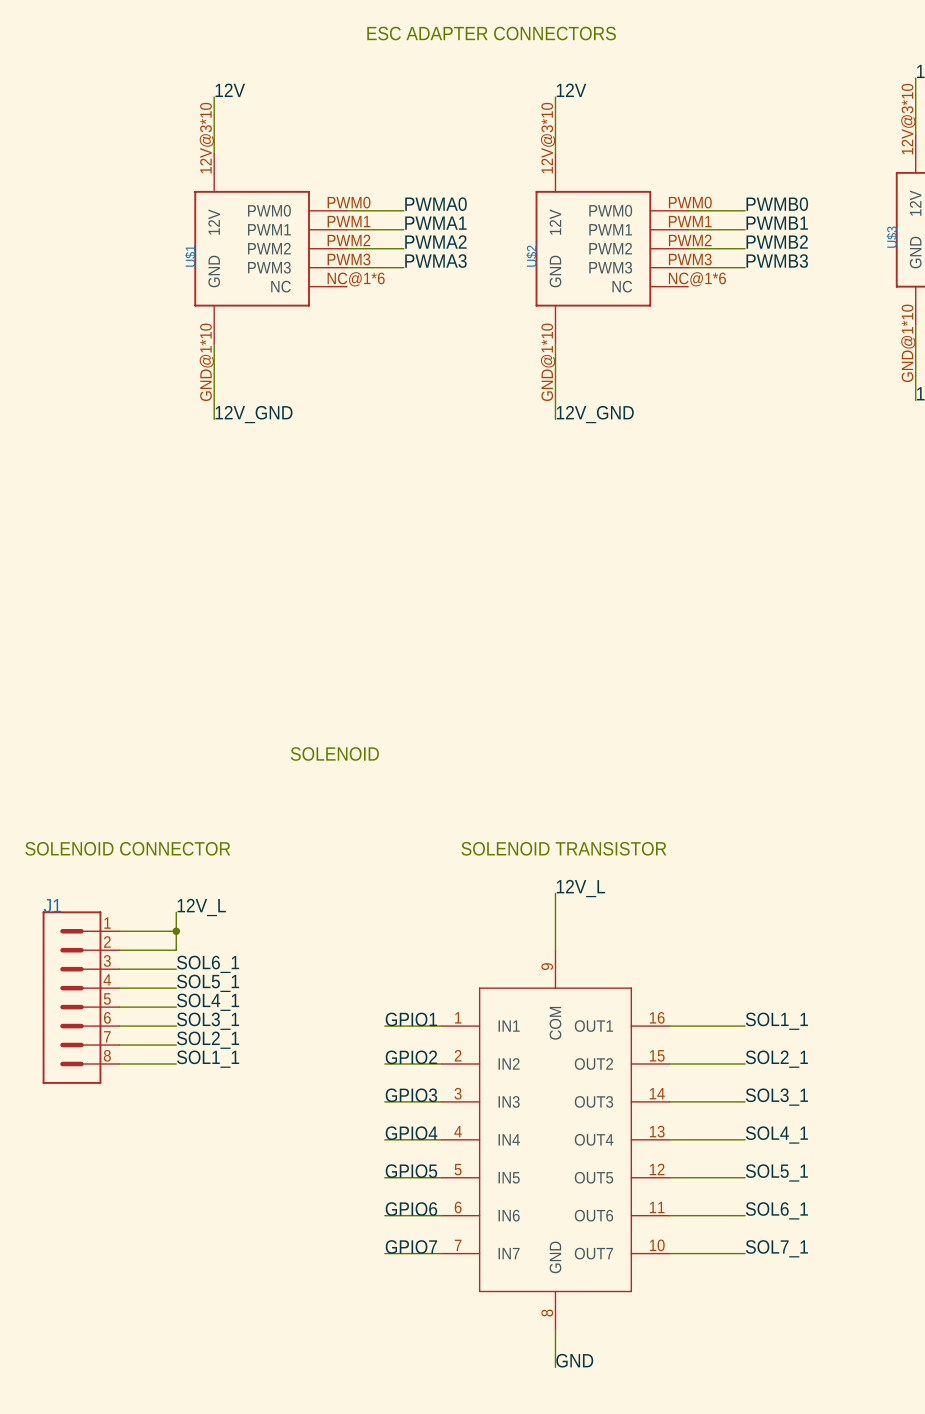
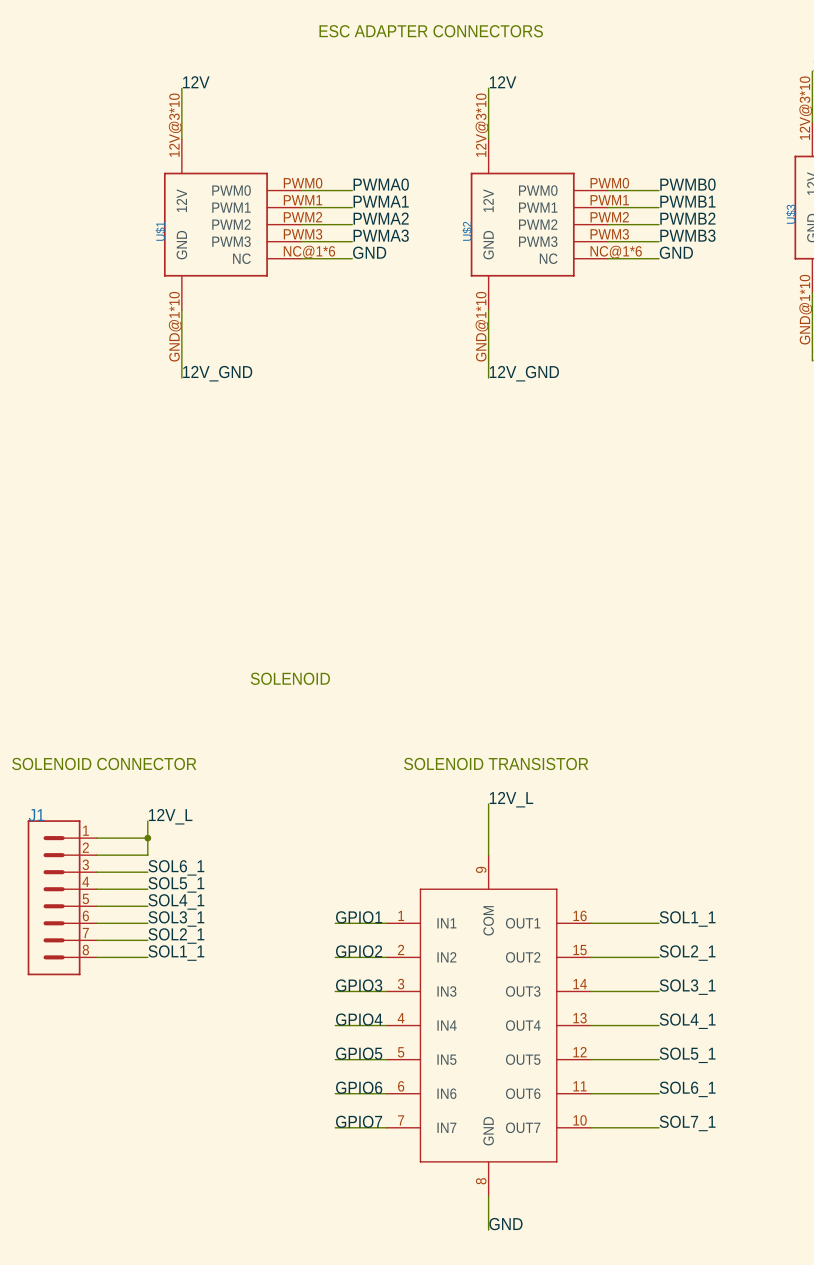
label: none -> GND (369, 252)
label: none -> GND (676, 252)
wire: none -> (301, 258) (352, 258)
wire: none -> (607, 258) (659, 258)

